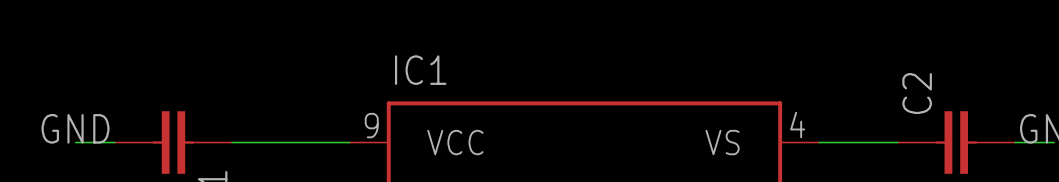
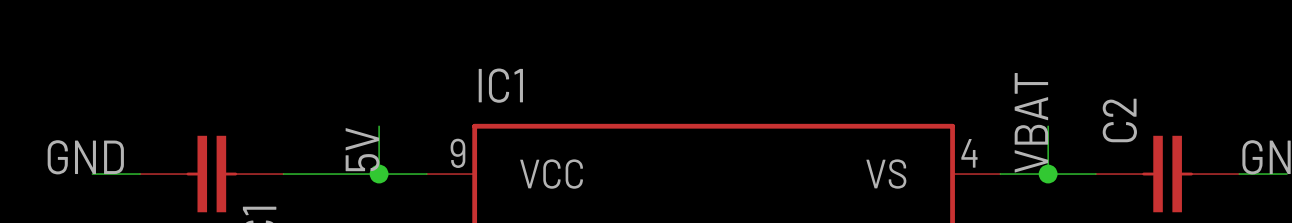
label: none -> VBAT (1031, 122)
wire: none -> (379, 126) (379, 174)
wire: none -> (1048, 126) (1048, 174)
label: none -> 5V (362, 149)
junction: none -> (379, 174)
junction: none -> (1048, 174)

